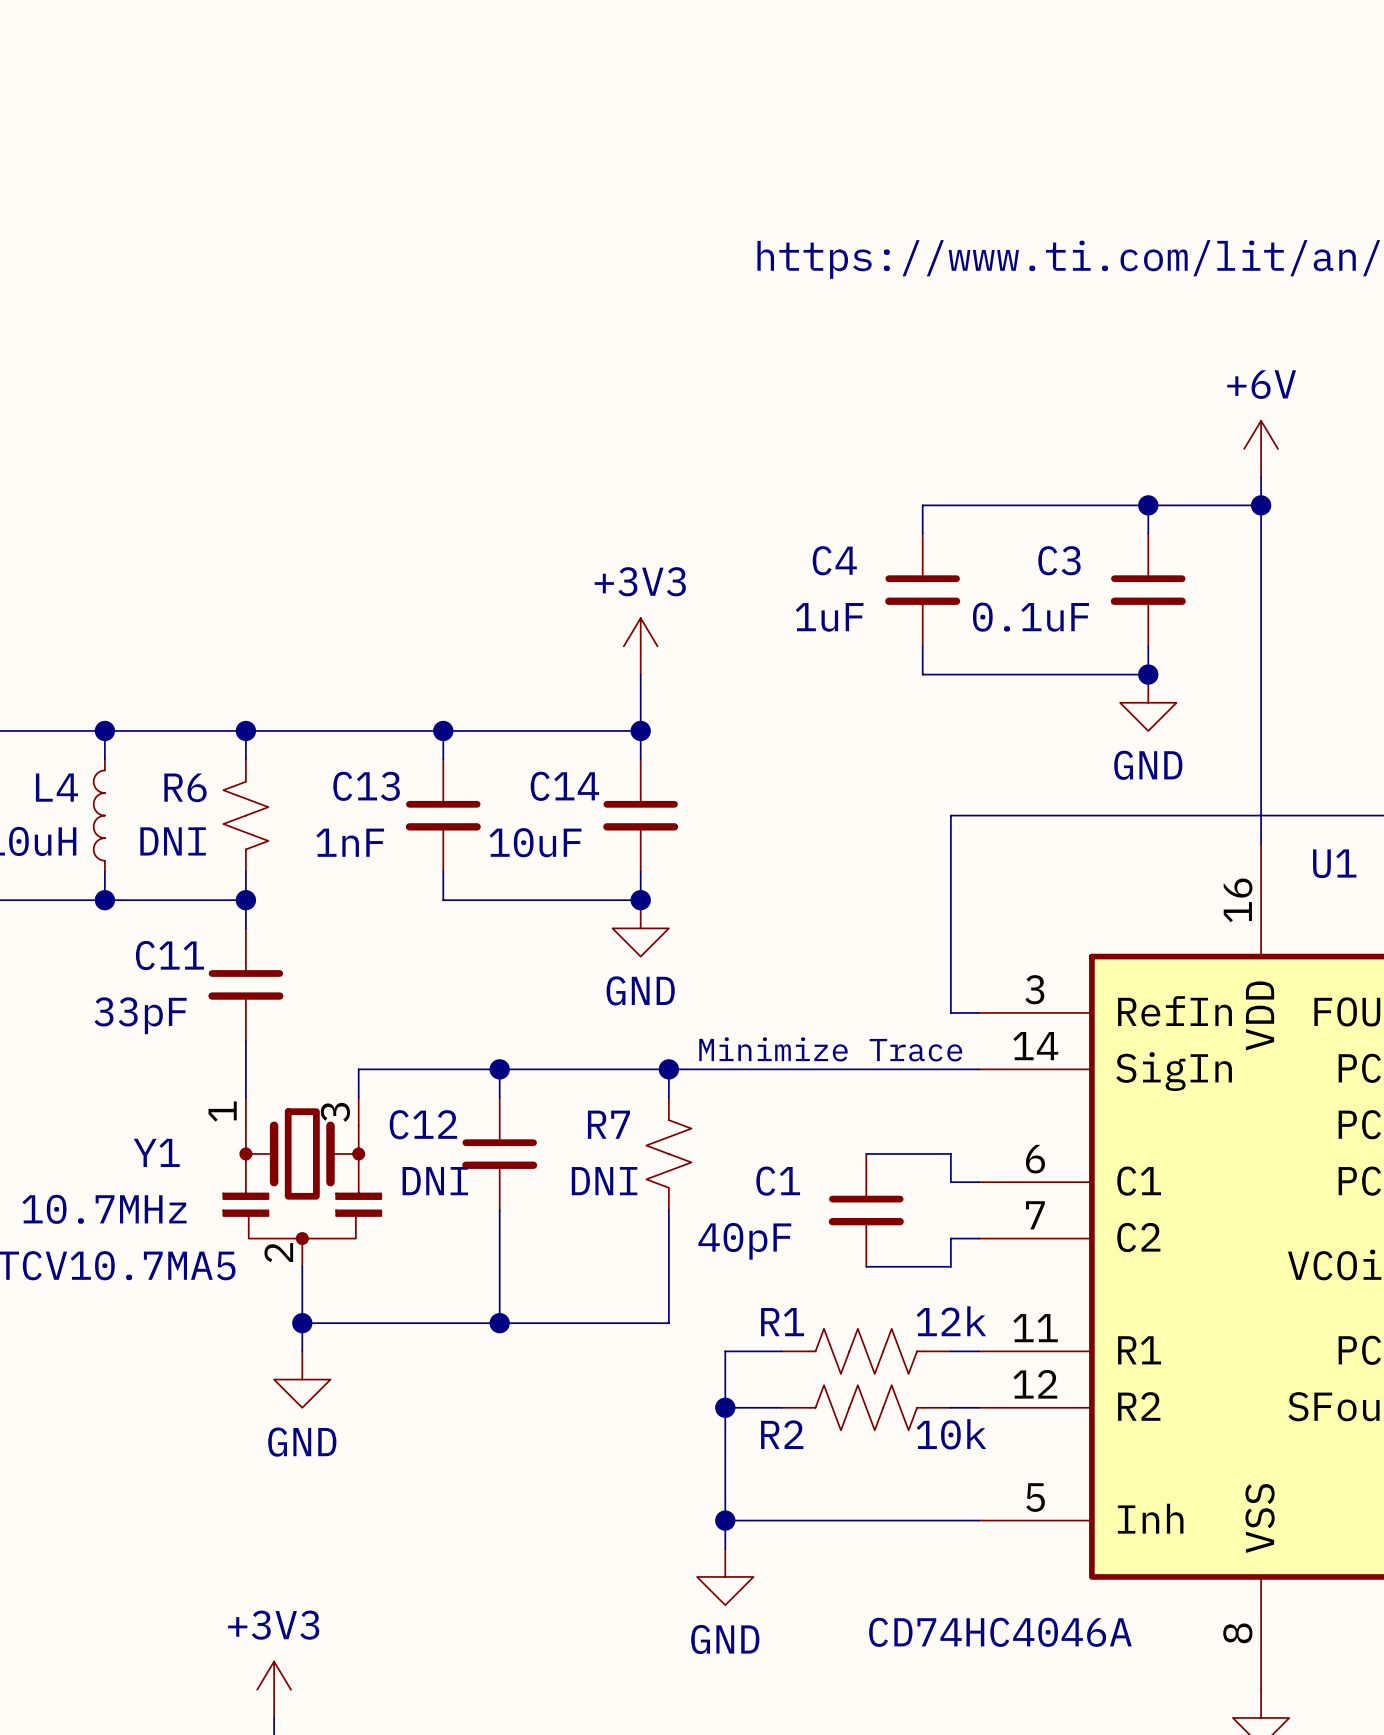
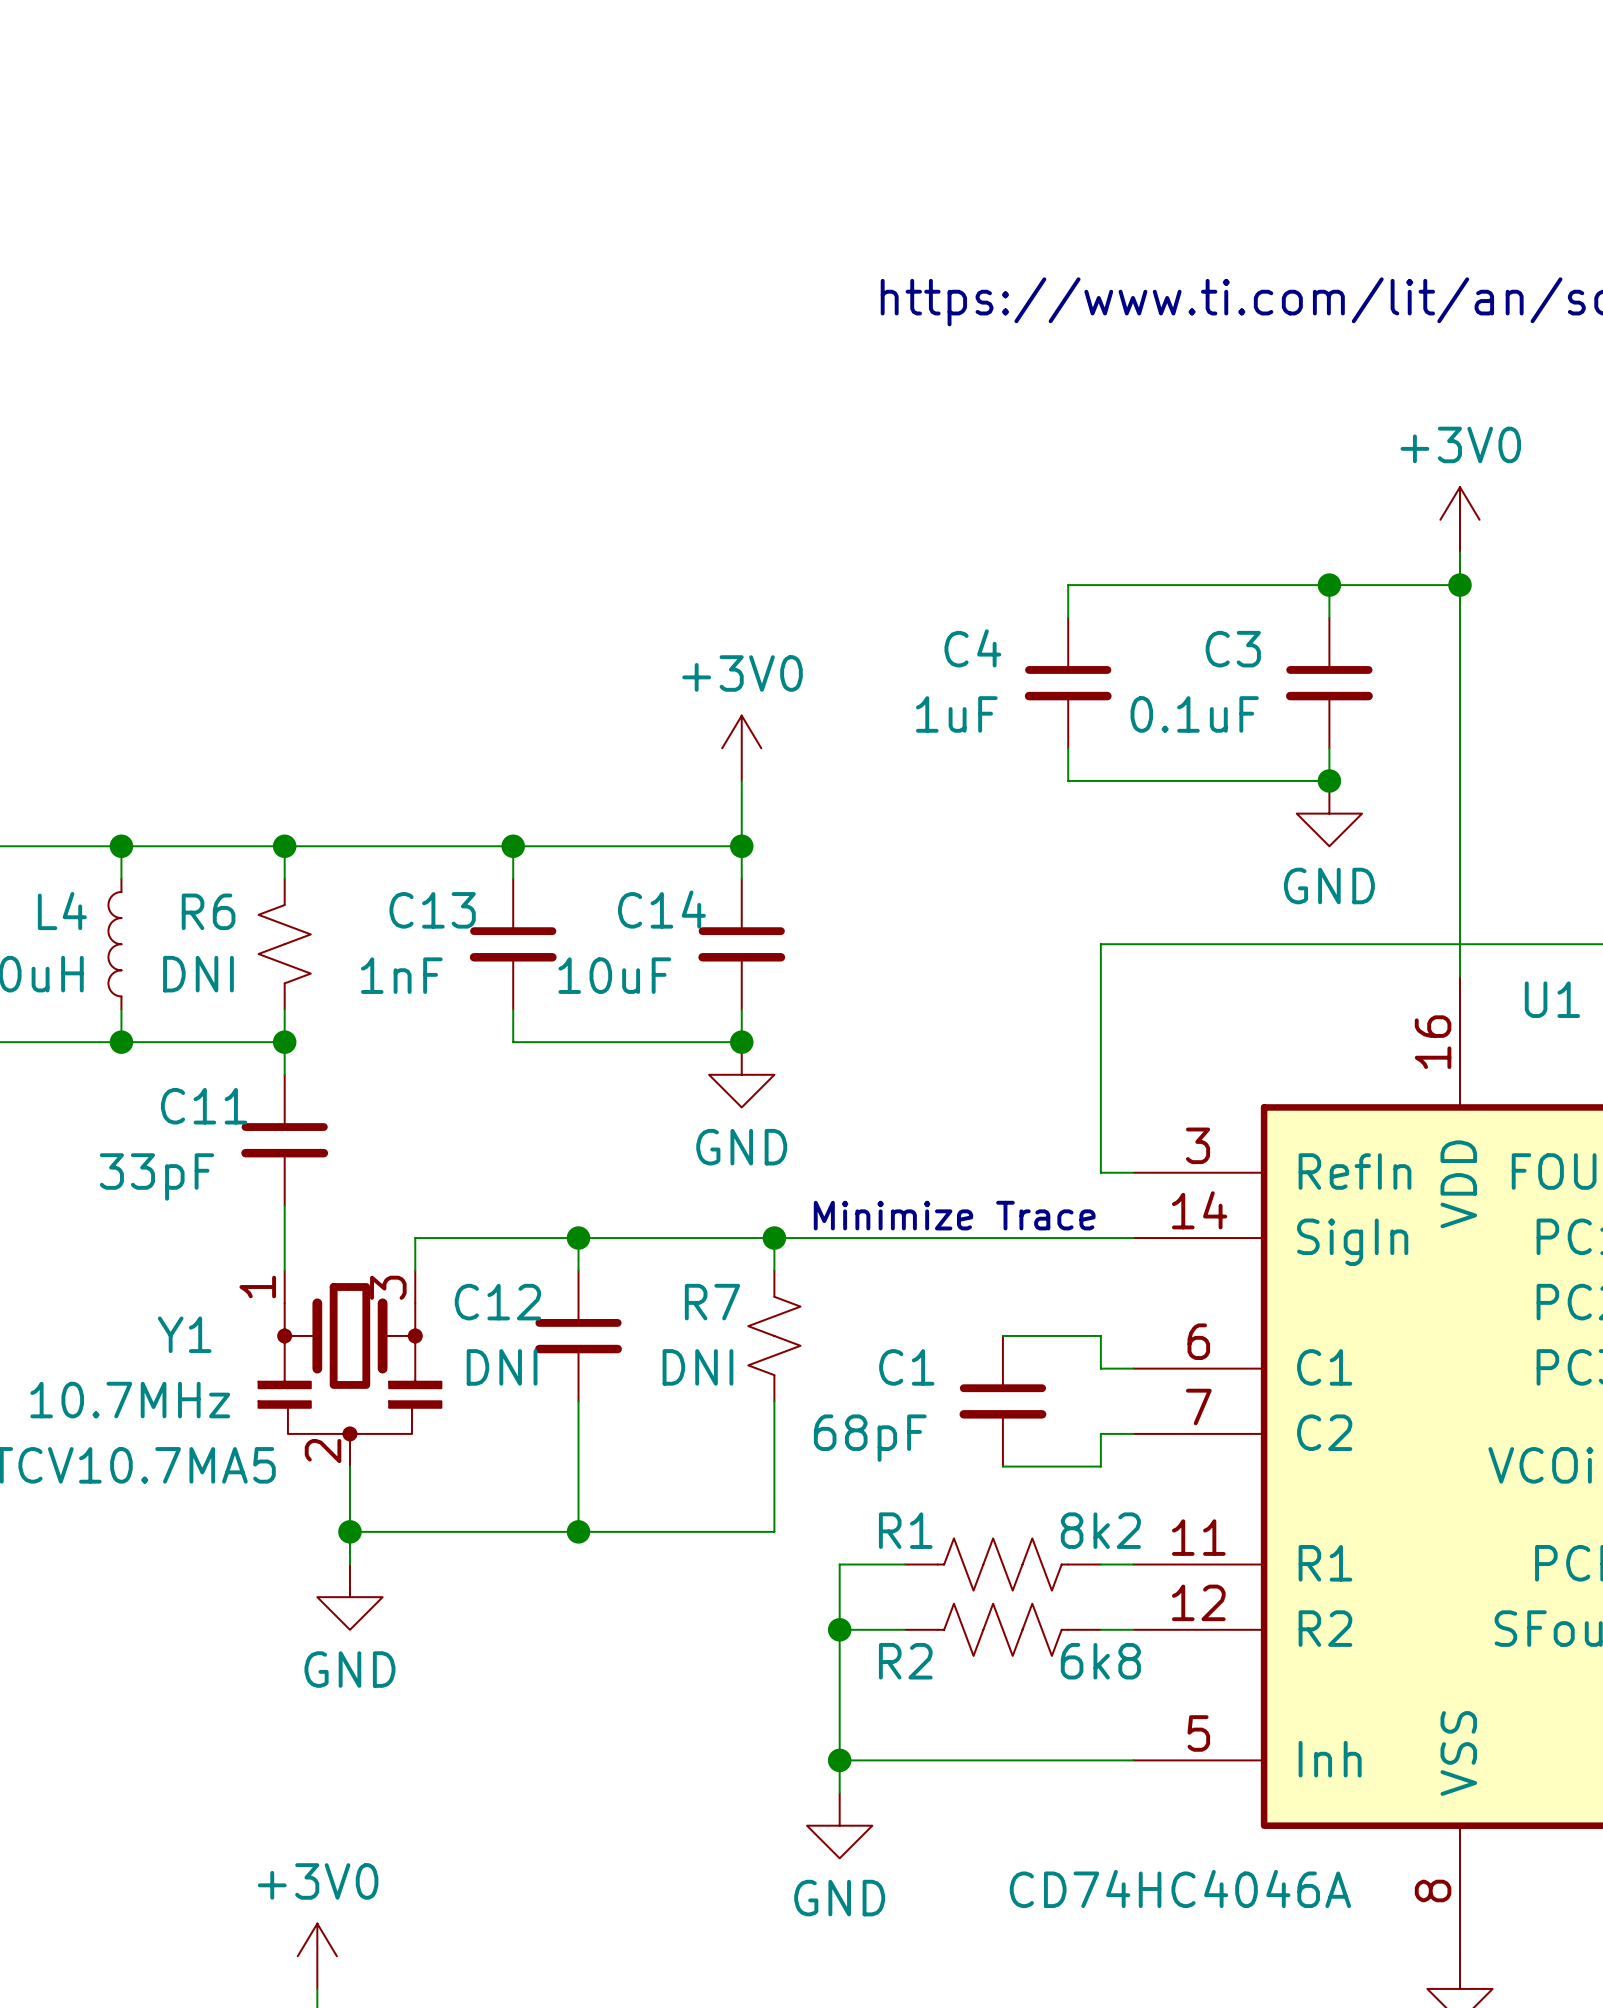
power symbol: +6V (1261, 448) -> +3V0 (1459, 519)
power symbol: +3V3 (640, 646) -> +3V0 (741, 748)
C1 value: 40pF (744, 1241) -> 68pF (870, 1438)
R1 value: 12k (951, 1321) -> 8k2 (1100, 1530)
R2 value: 10k (951, 1434) -> 6k8 (1100, 1661)
power symbol: +3V3 (274, 1689) -> +3V0 (317, 1956)

